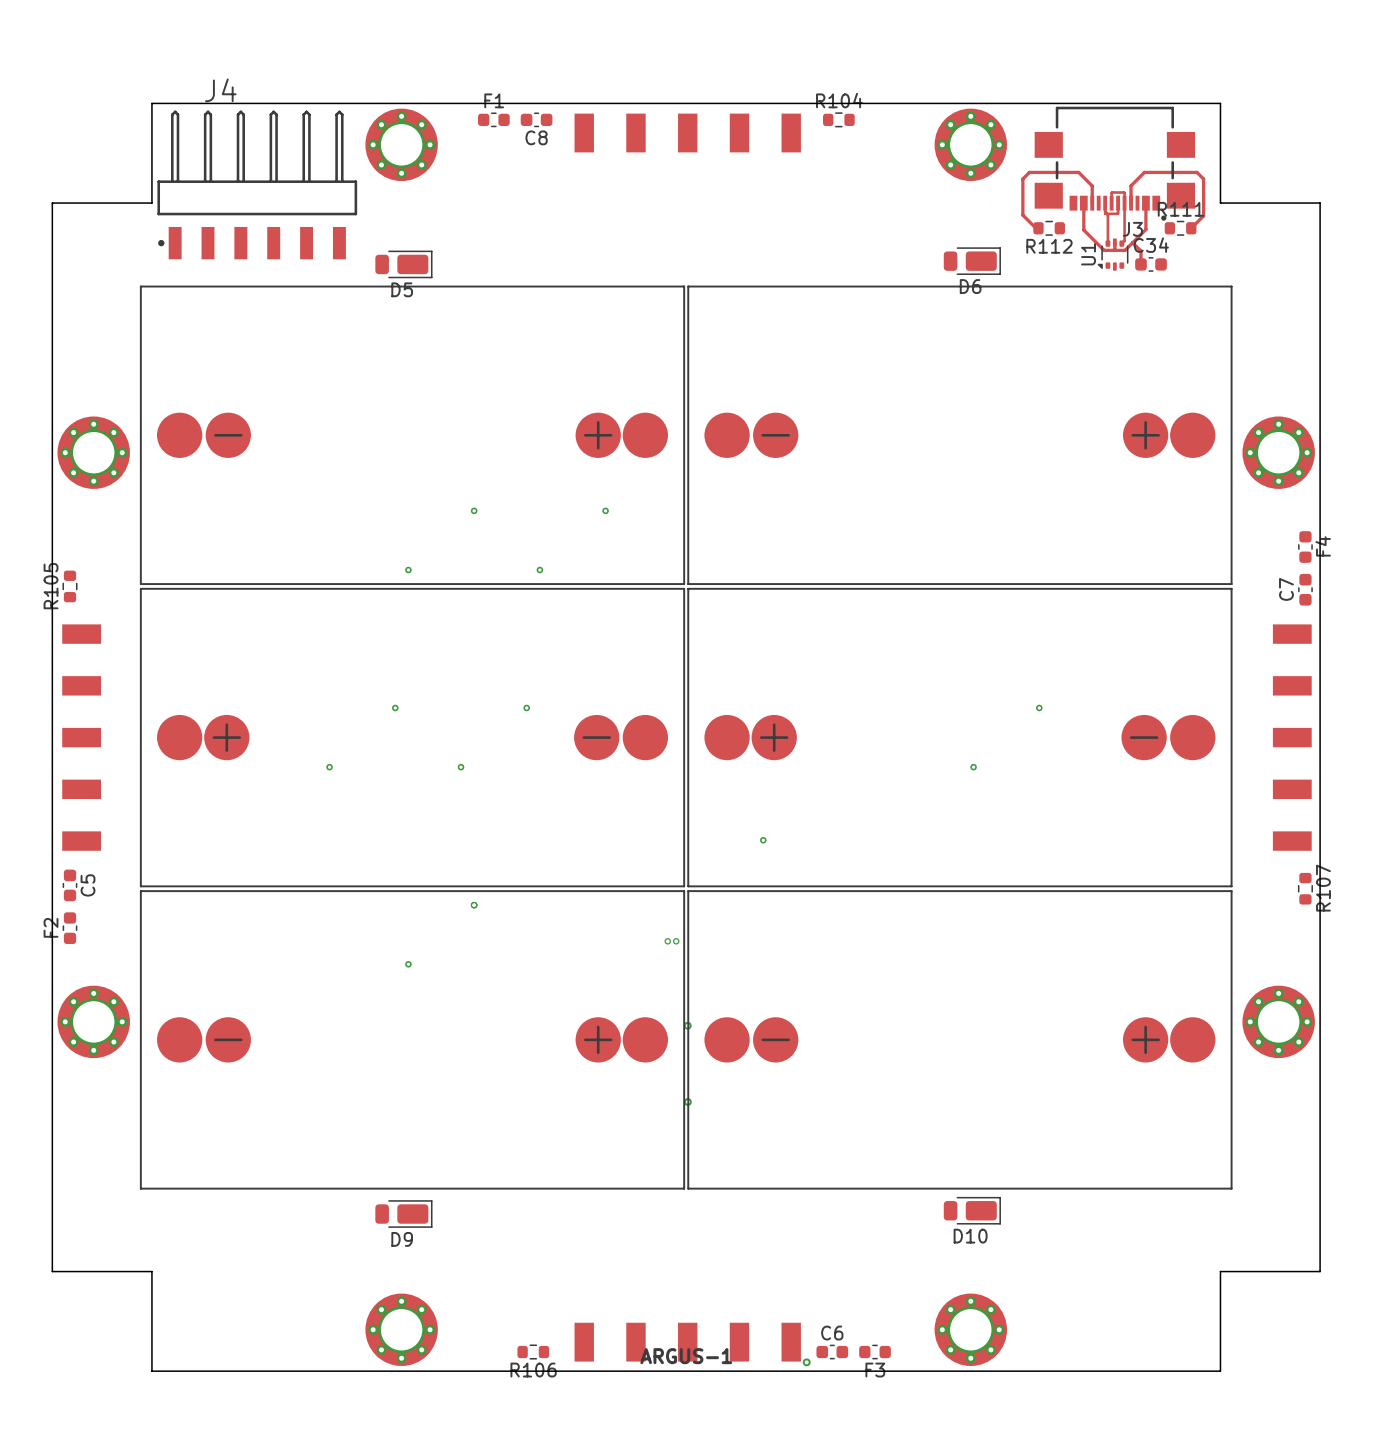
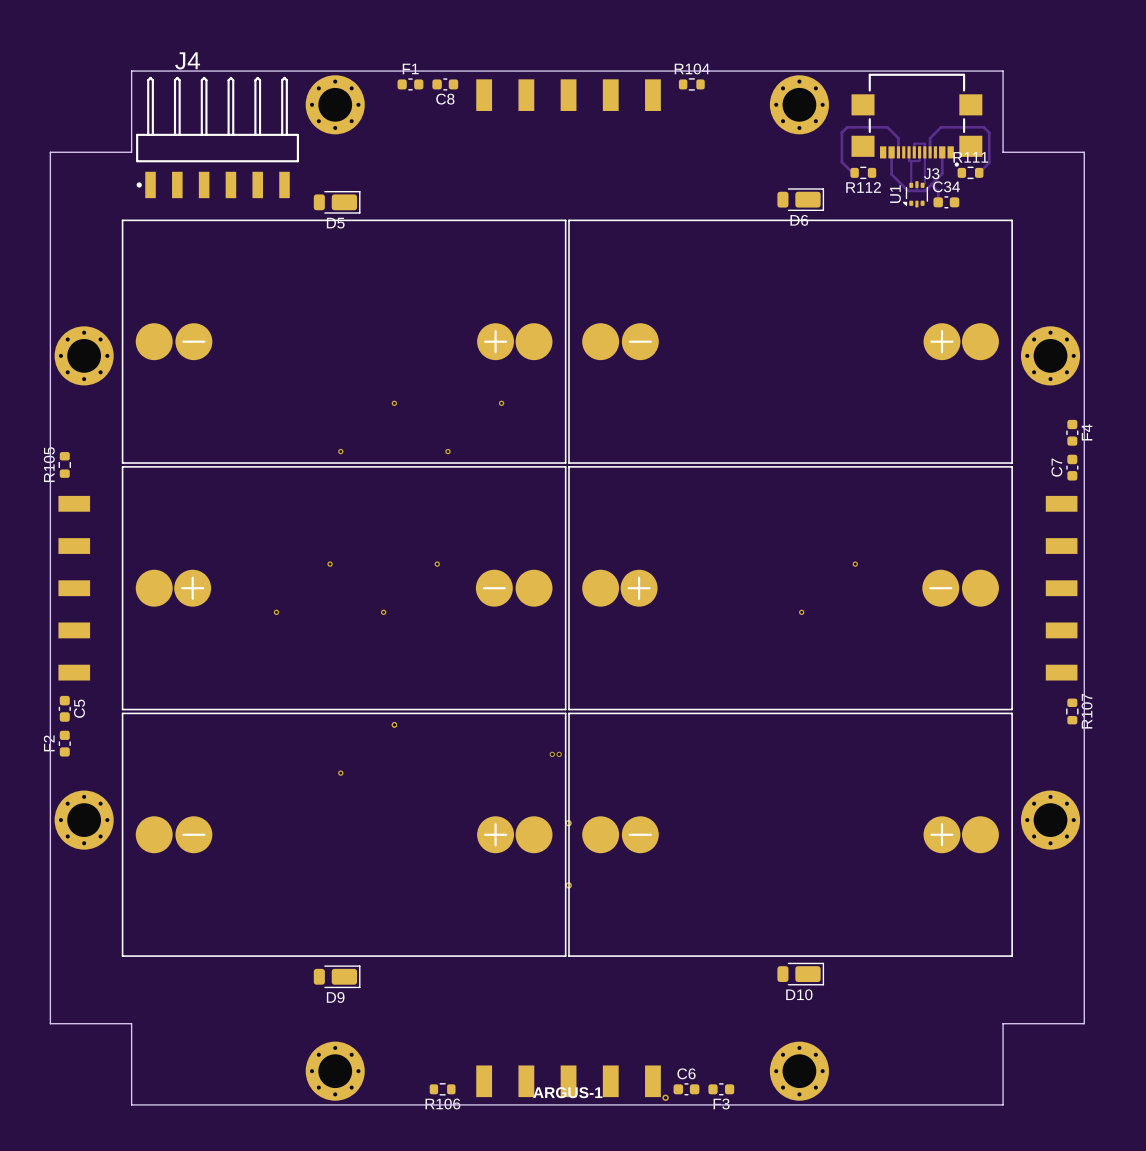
via: (763, 840) -> none

